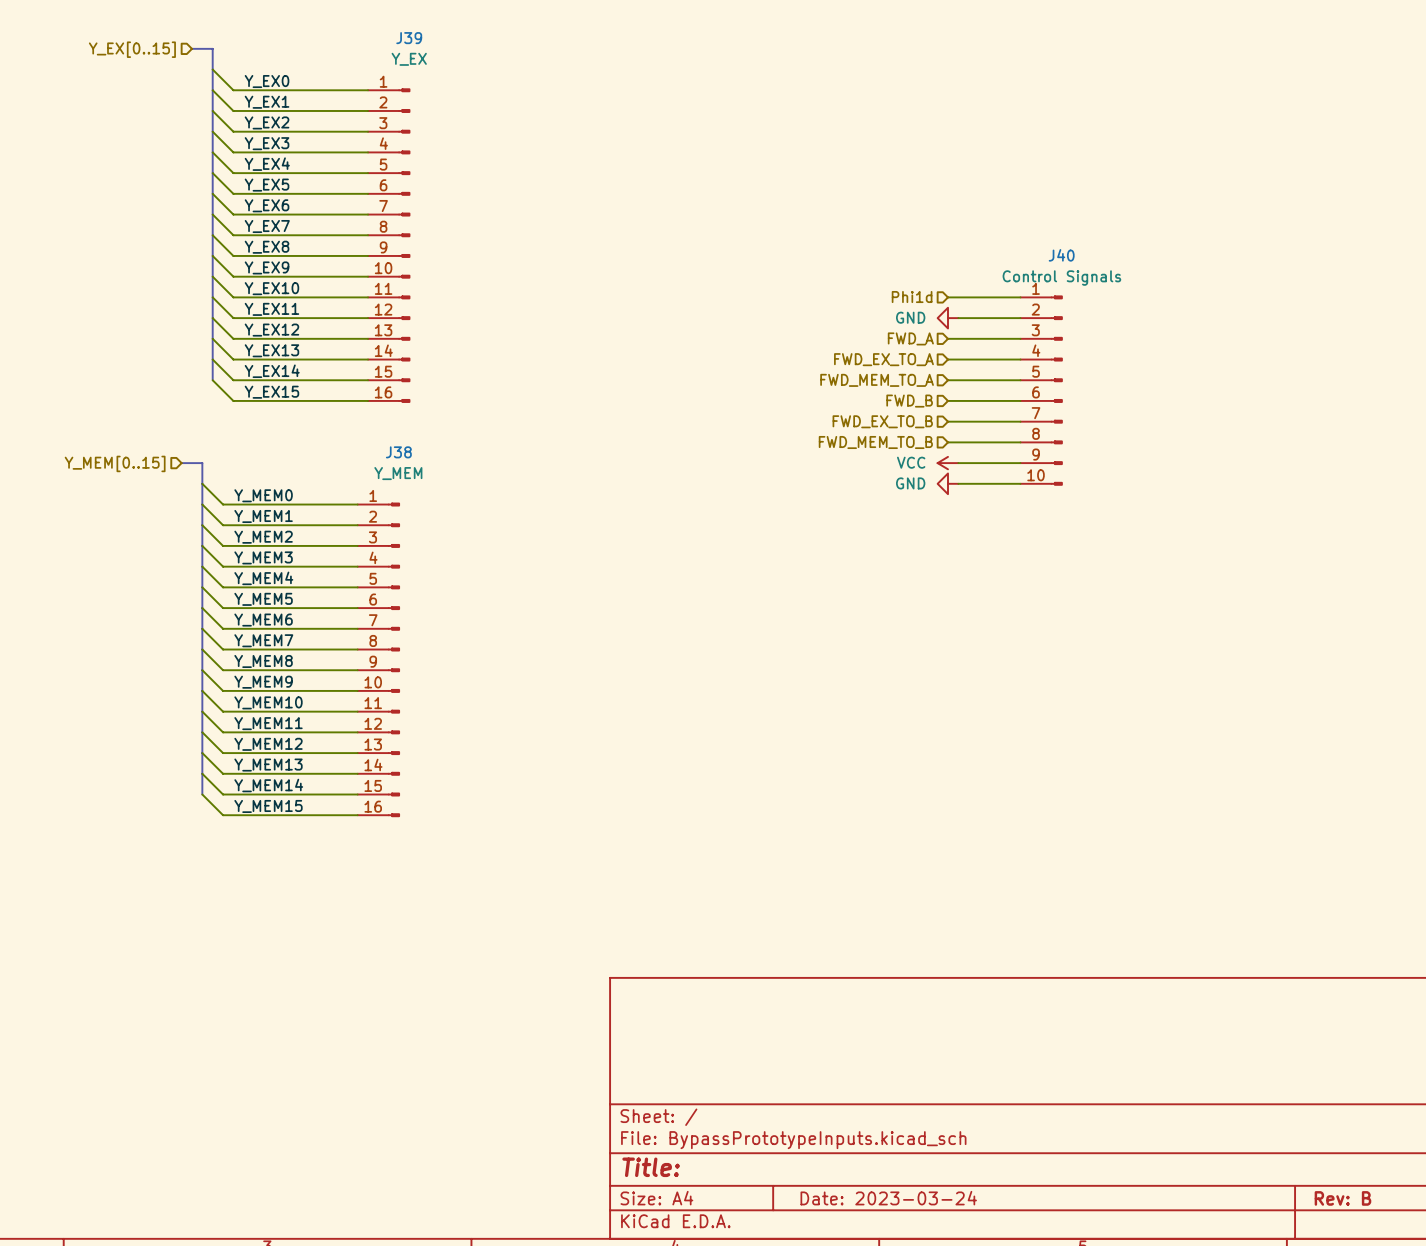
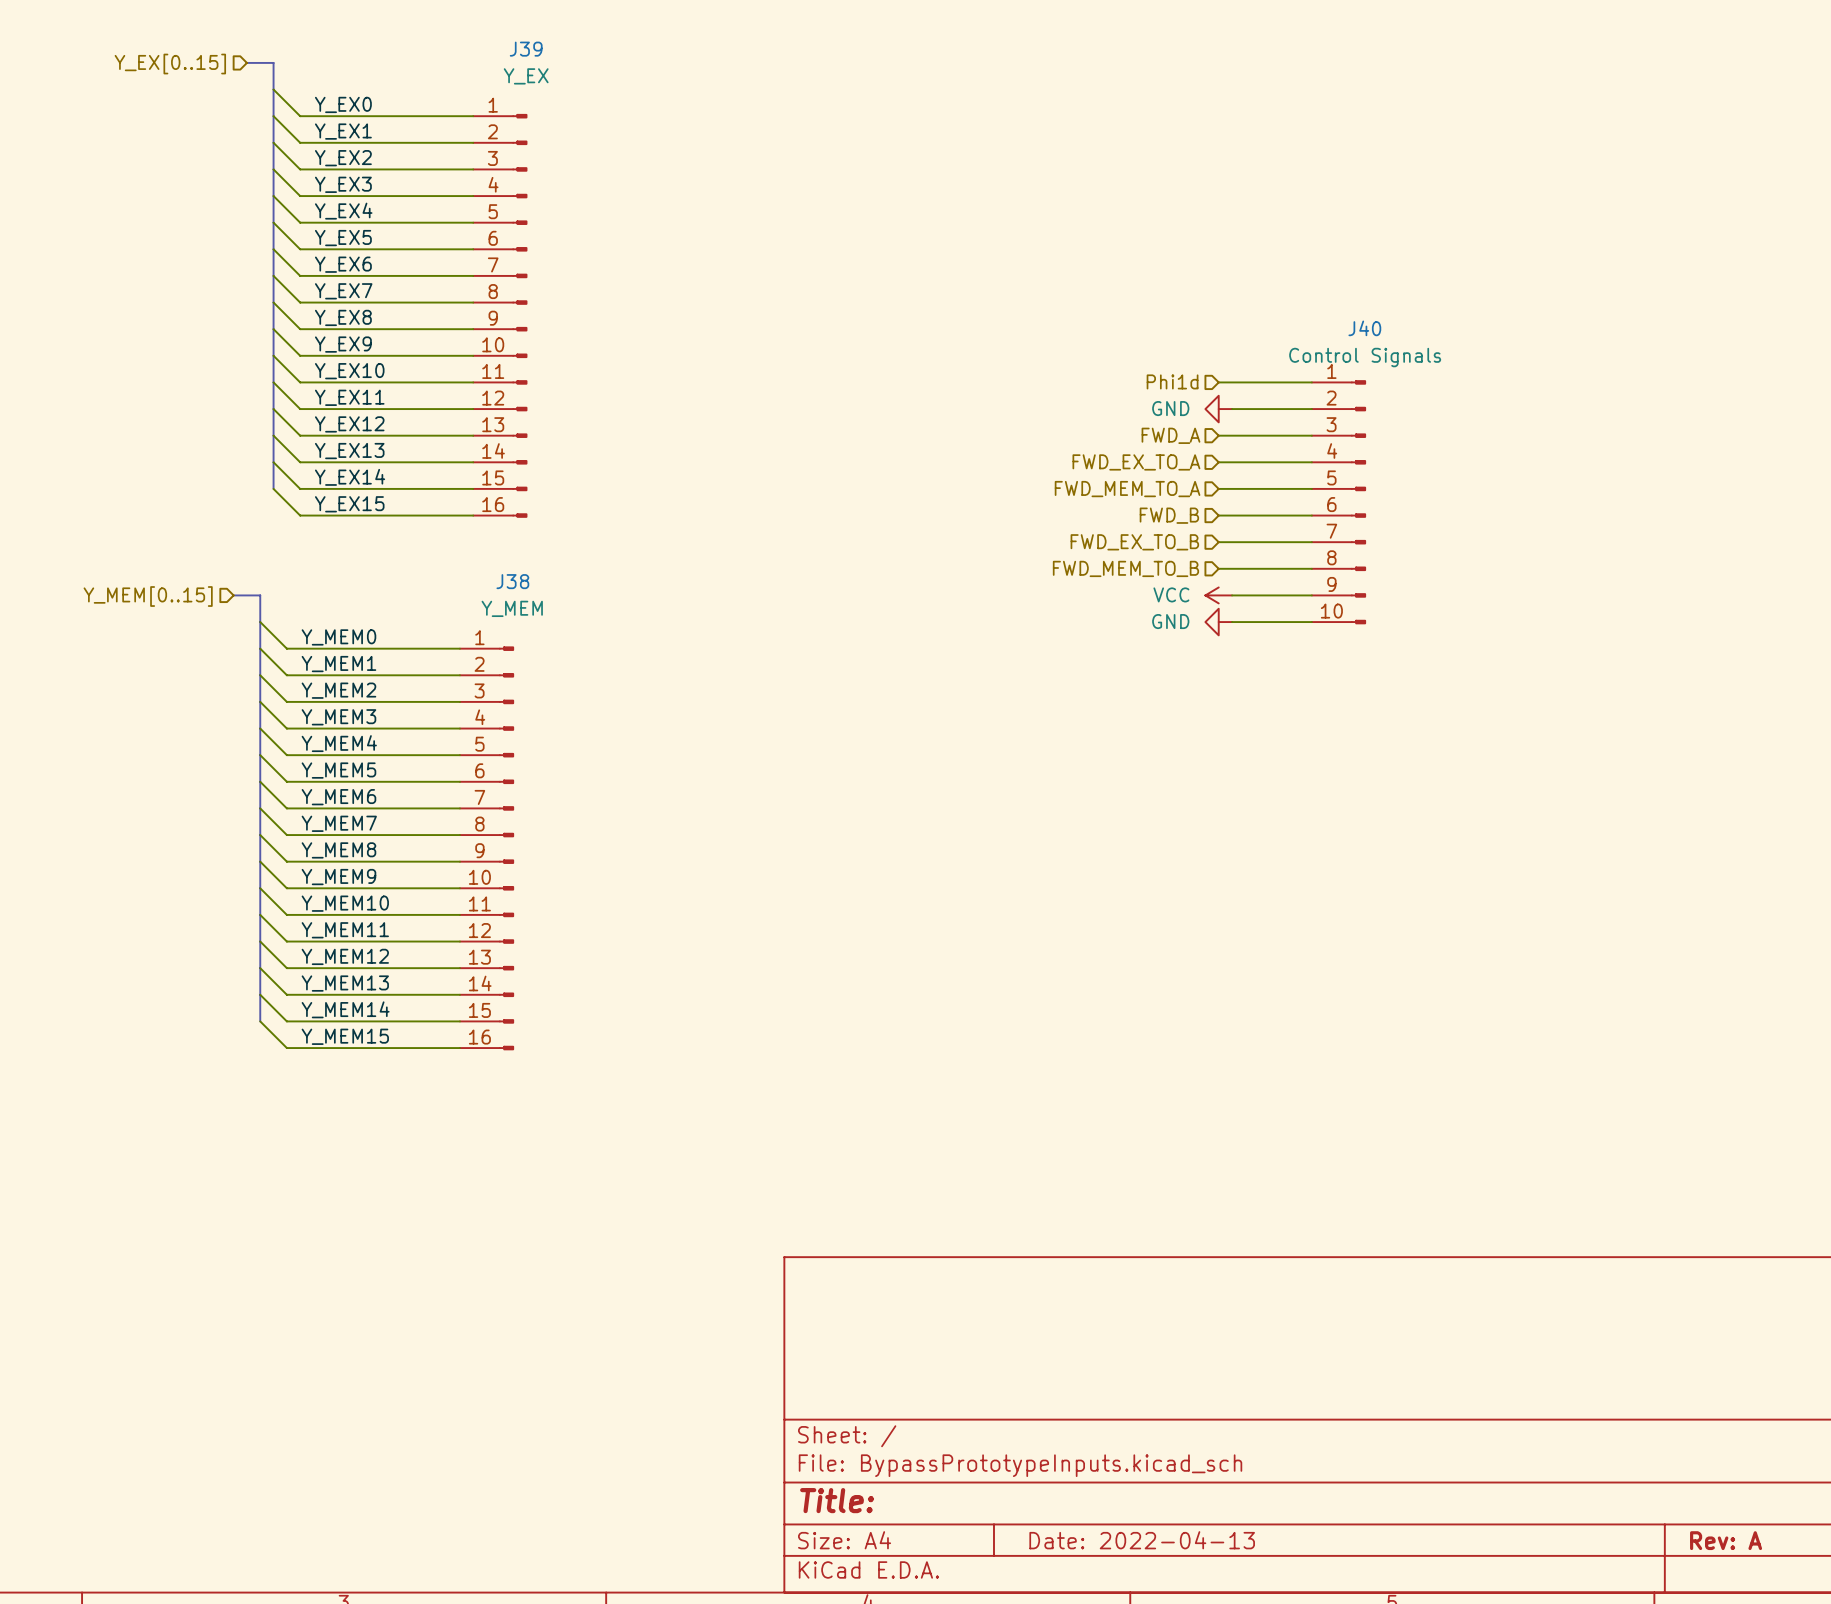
title block: Date: 2023-03-24 (888, 1198) -> Date: 2022-04-13 (1142, 1540)
title block: Rev: B (1342, 1198) -> Rev: A (1726, 1540)

